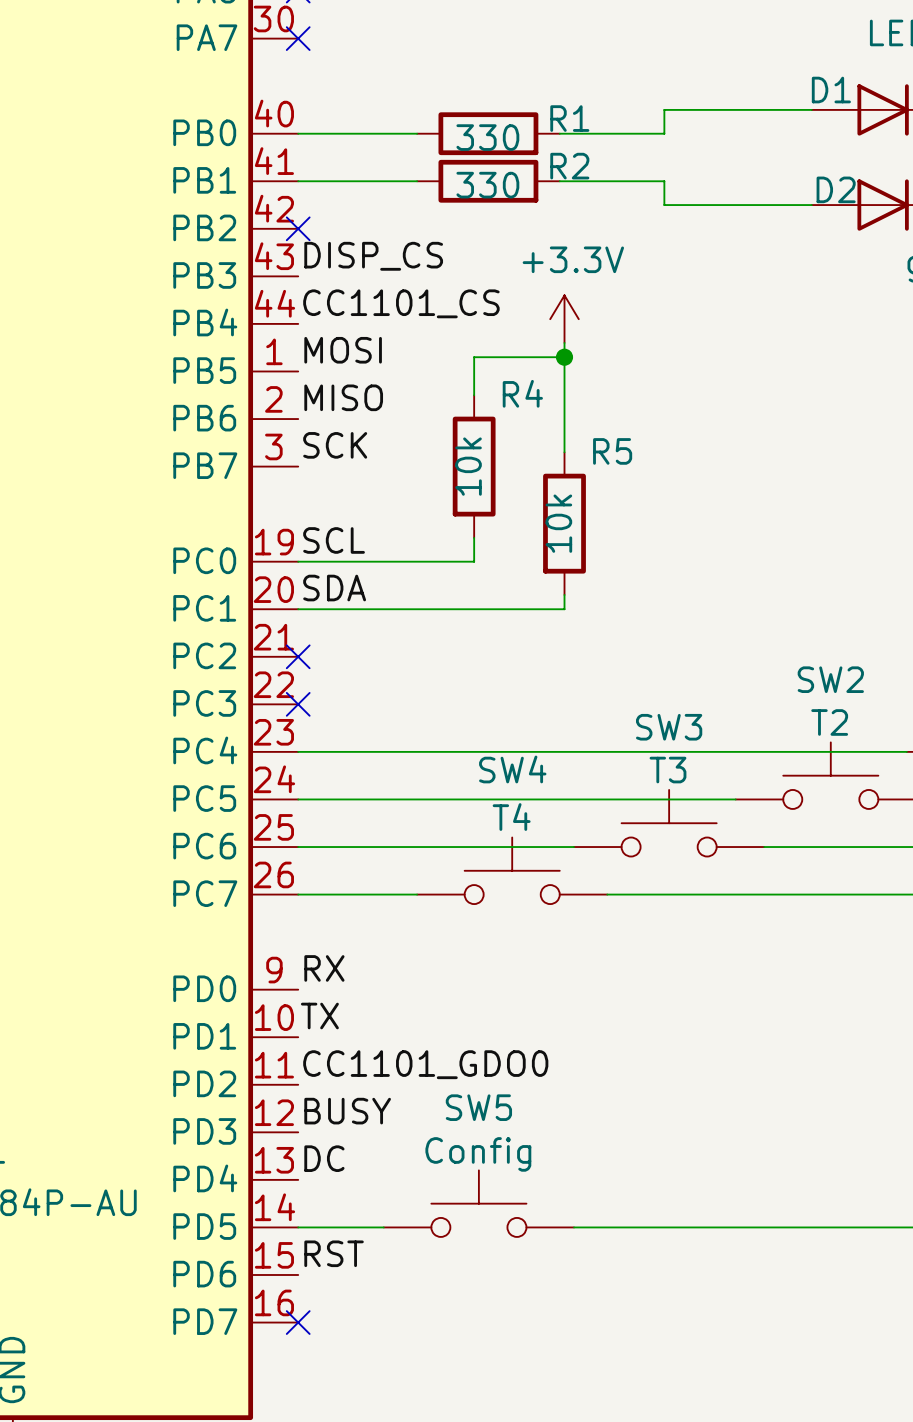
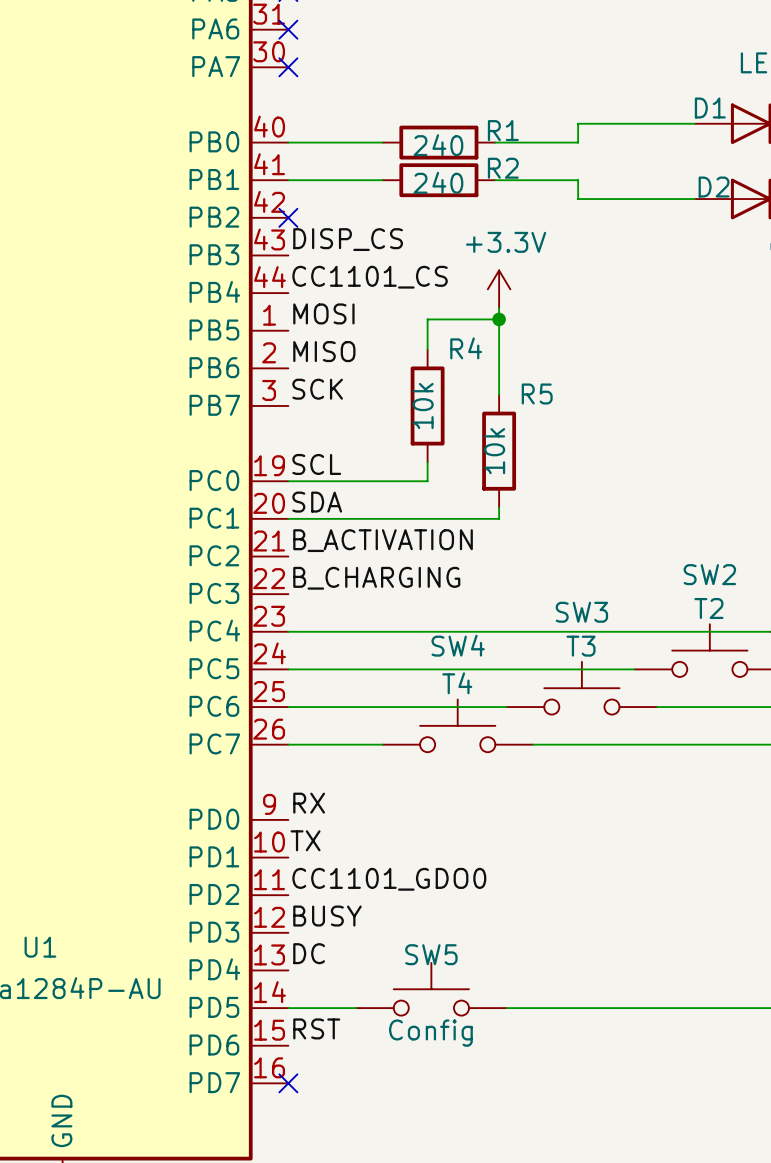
R1 value: 330 (487, 137) -> 240 (438, 145)
R2 value: 330 (487, 185) -> 240 (438, 182)
label: none -> B_ACTIVATION (383, 540)
no-connect mark: (298, 656) -> none
label: none -> B_CHARGING (376, 578)
no-connect mark: (298, 704) -> none
SW5 name position: SW5 (478, 1107) -> SW5 (431, 954)
SW5 value position: Config (478, 1154) -> Config (430, 1033)

